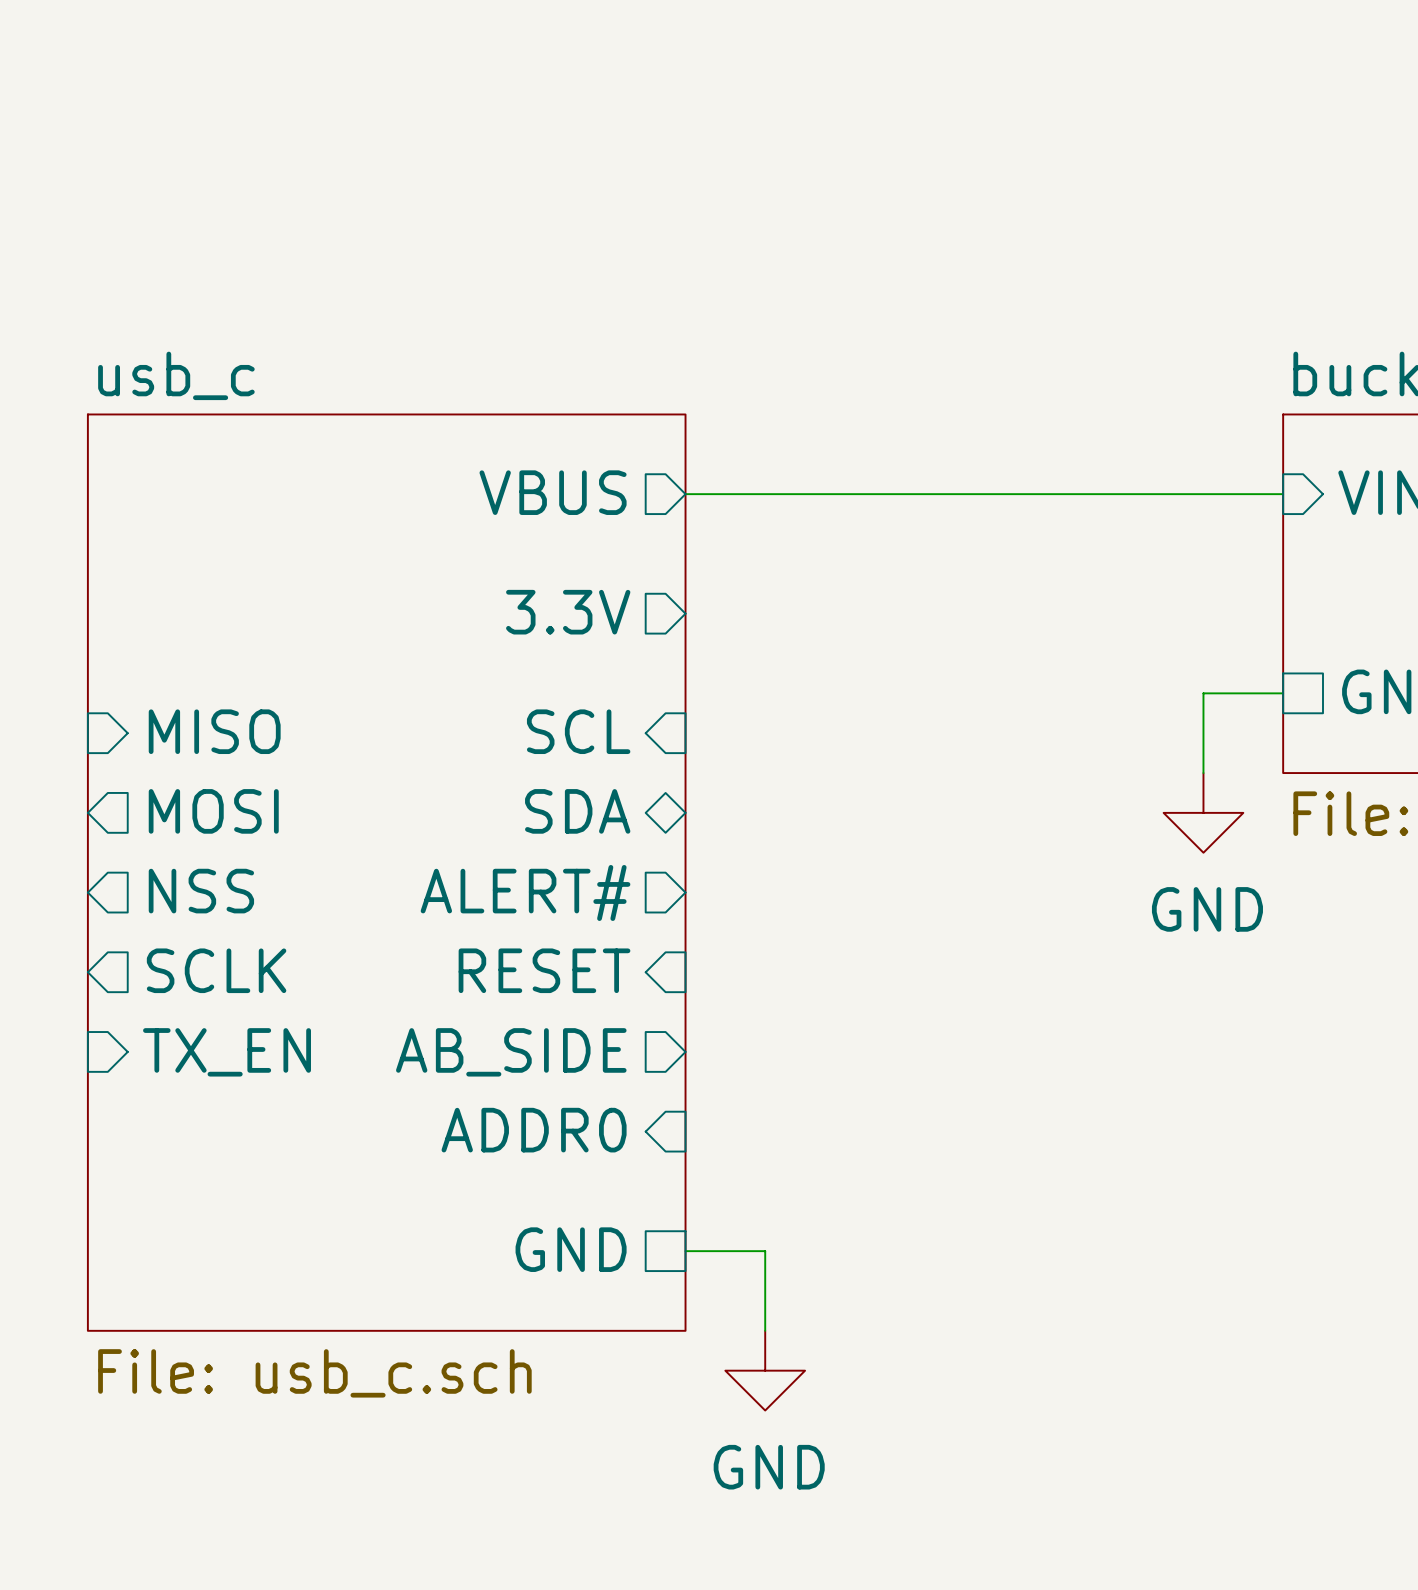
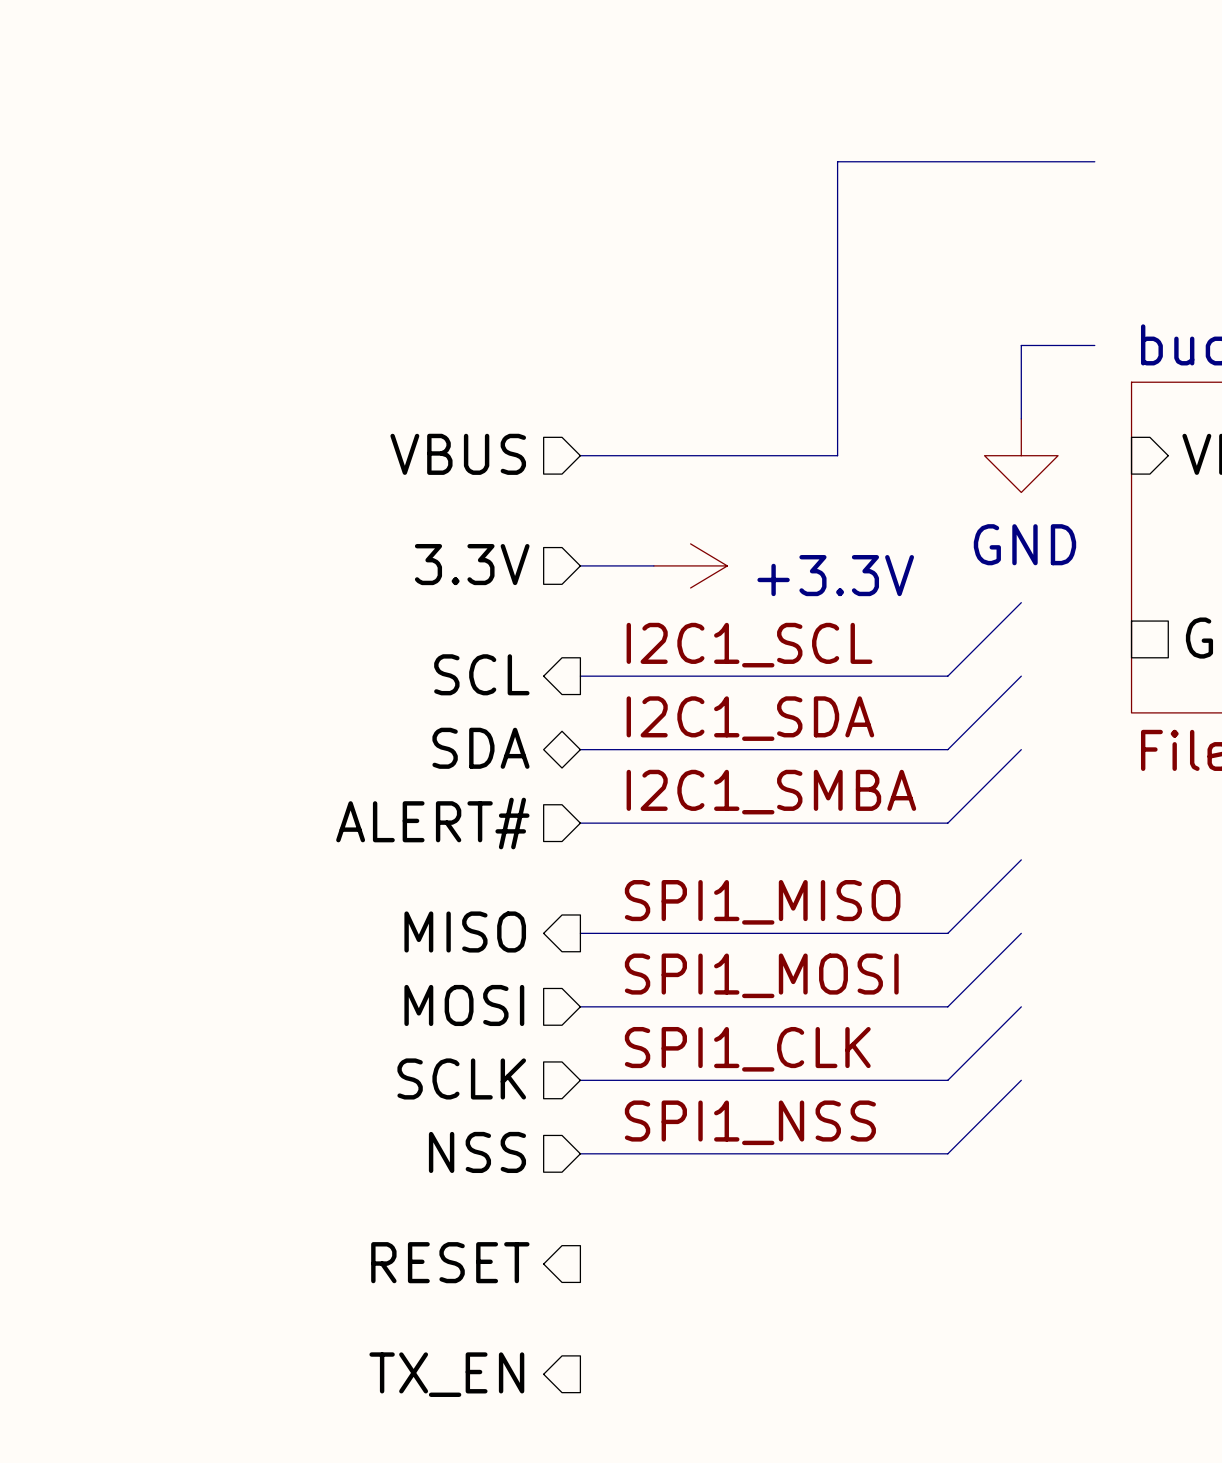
wire: (964, 494) (1283, 494) -> (837, 455) (837, 161) (1094, 161)
wire: none -> (580, 565) (653, 565)
power symbol: none -> +3.3V (690, 565)
wire: none -> (1021, 602) (947, 676) (580, 676)
wire: (1283, 693) (1203, 693) (1203, 773) -> (1094, 345) (1021, 345) (1021, 418)
label: none -> I2C1_SCL (749, 645)
sheet pin rotation: 0° (214, 731) -> 180° (465, 931)
sheet pin position: MISO (214, 731) -> MISO (465, 931)
wire: none -> (1021, 676) (947, 749) (580, 749)
label: none -> I2C1_SDA (750, 718)
sheet pin rotation: 0° (213, 811) -> 180° (464, 1005)
sheet pin position: MOSI (213, 811) -> MOSI (464, 1005)
wire: none -> (1021, 749) (947, 823) (580, 823)
power symbol position: GND (1203, 812) -> GND (1021, 455)
label: none -> I2C1_SMBA (771, 792)
sheet usb_c: File: usb_c.sch (386, 872) -> none
sheet pin: NSS (201, 891) -> none
wire: none -> (1021, 859) (947, 933) (580, 933)
sheet pin rotation: 0° (216, 970) -> 180° (461, 1078)
sheet pin position: SCLK (216, 970) -> SCLK (461, 1078)
sheet pin position: RESET (544, 970) -> RESET (450, 1262)
label: none -> SPI1_MISO (762, 902)
wire: none -> (1021, 933) (947, 1006) (580, 1006)
sheet pin rotation: 0° (227, 1052) -> 180° (446, 1374)
sheet pin position: TX_EN (227, 1052) -> TX_EN (446, 1374)
sheet pin: AB_SIDE (511, 1052) -> none
label: none -> SPI1_MOSI (761, 975)
wire: none -> (1021, 1006) (947, 1080) (580, 1080)
sheet pin: ADDR0 (534, 1130) -> none
label: none -> SPI1_CLK (747, 1049)
label: none -> SPI1_NSS (750, 1122)
sheet pin shape: passive (571, 1249) -> output (477, 1152)
sheet pin: GND (571, 1249) -> NSS (477, 1152)
wire: (765, 1251) (765, 1330) -> (653, 1153) (947, 1153) (1021, 1080)
power symbol: GND (765, 1370) -> none

